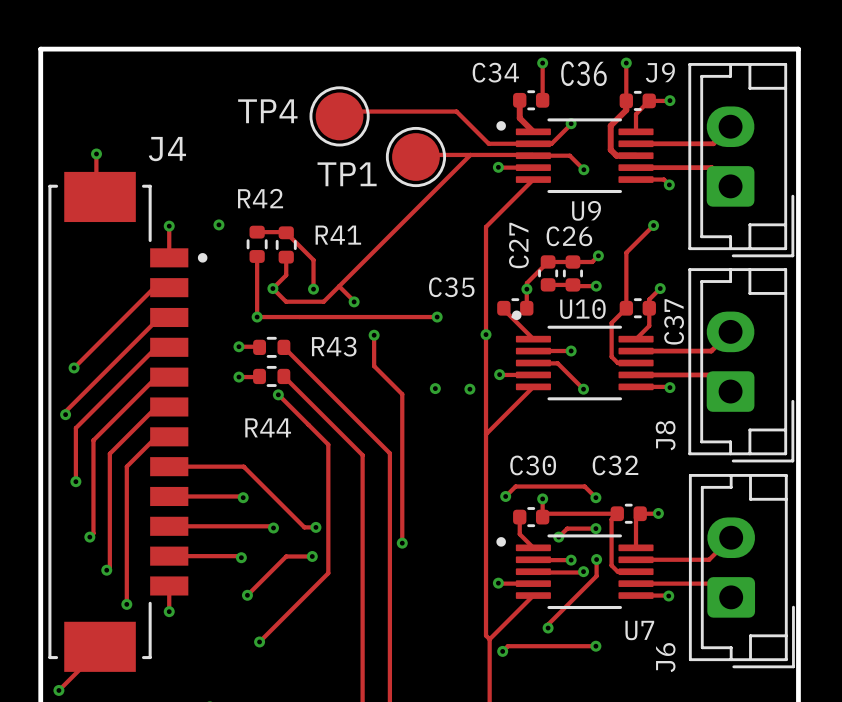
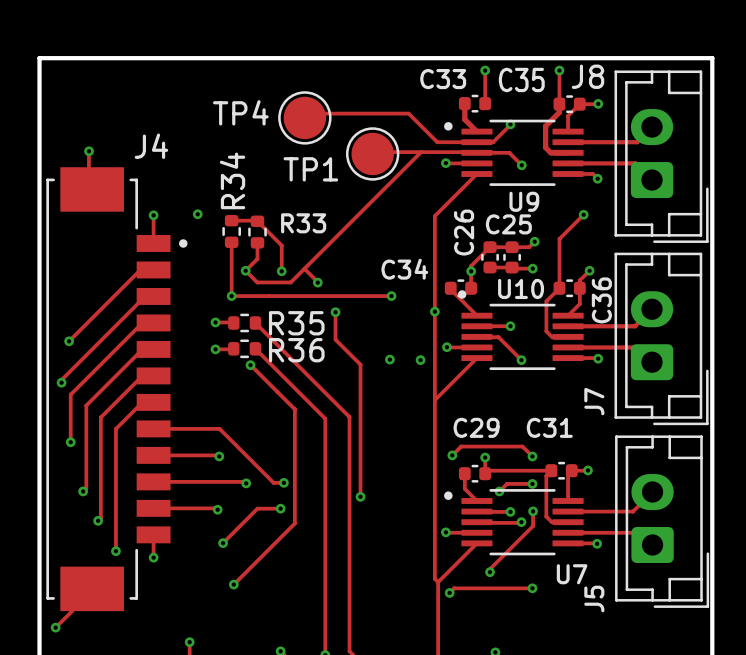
C34 name: C34 (495, 72) -> C33 (443, 79)
J9 name: J9 (660, 72) -> J8 (588, 76)
C36 name: C36 (583, 73) -> C35 (521, 79)
R42 name: R42 (260, 198) -> R34 (232, 180)
R41 name: R41 (338, 235) -> R33 (303, 223)
C26 name: C26 (569, 236) -> C25 (508, 224)
C27 name: C27 (518, 245) -> C26 (464, 232)
C35 name: C35 (451, 287) -> C34 (404, 269)
C37 name: C37 (674, 321) -> C36 (601, 300)
R43 name: R43 (334, 346) -> R35 (296, 323)
R44 name: R44 (268, 427) -> R36 (296, 350)
J8 name: J8 (665, 435) -> J7 (594, 401)
C30 name: C30 (533, 465) -> C29 (476, 427)
C32 name: C32 (615, 465) -> C31 (549, 427)
J6 name: J6 (665, 657) -> J5 (594, 598)

